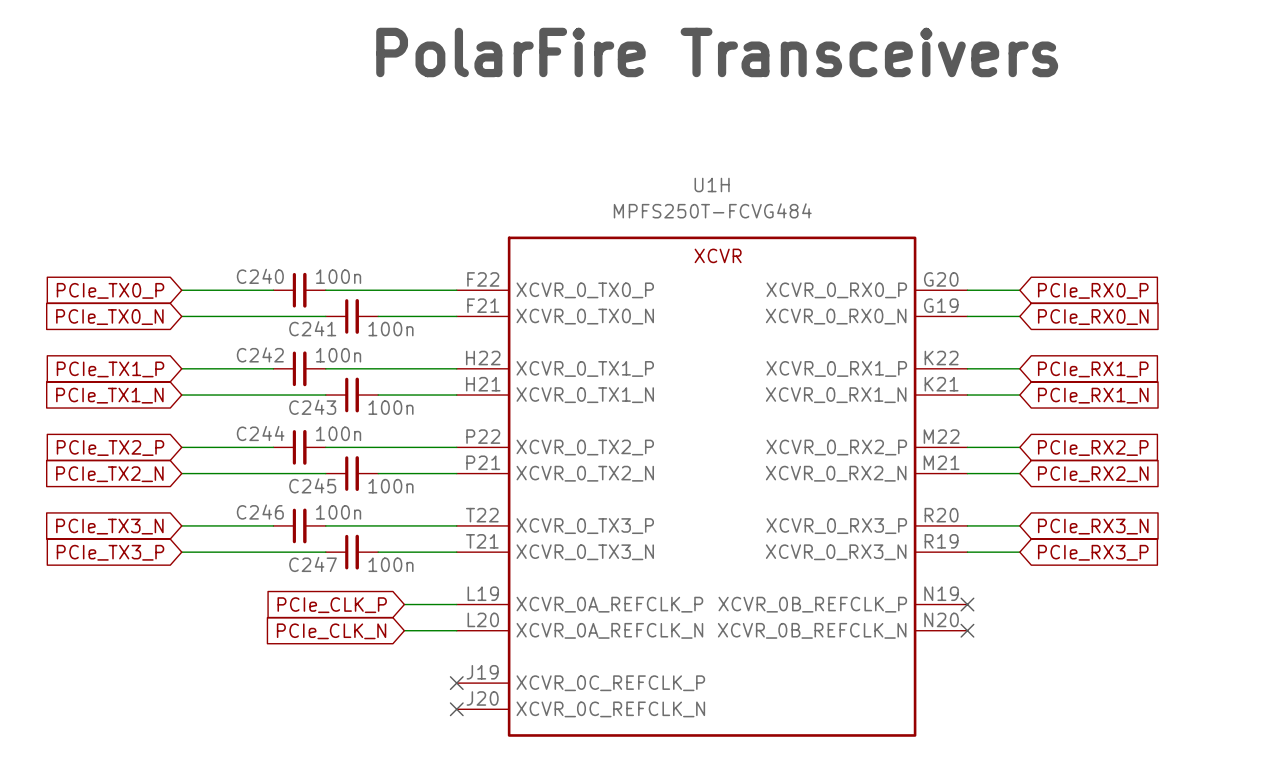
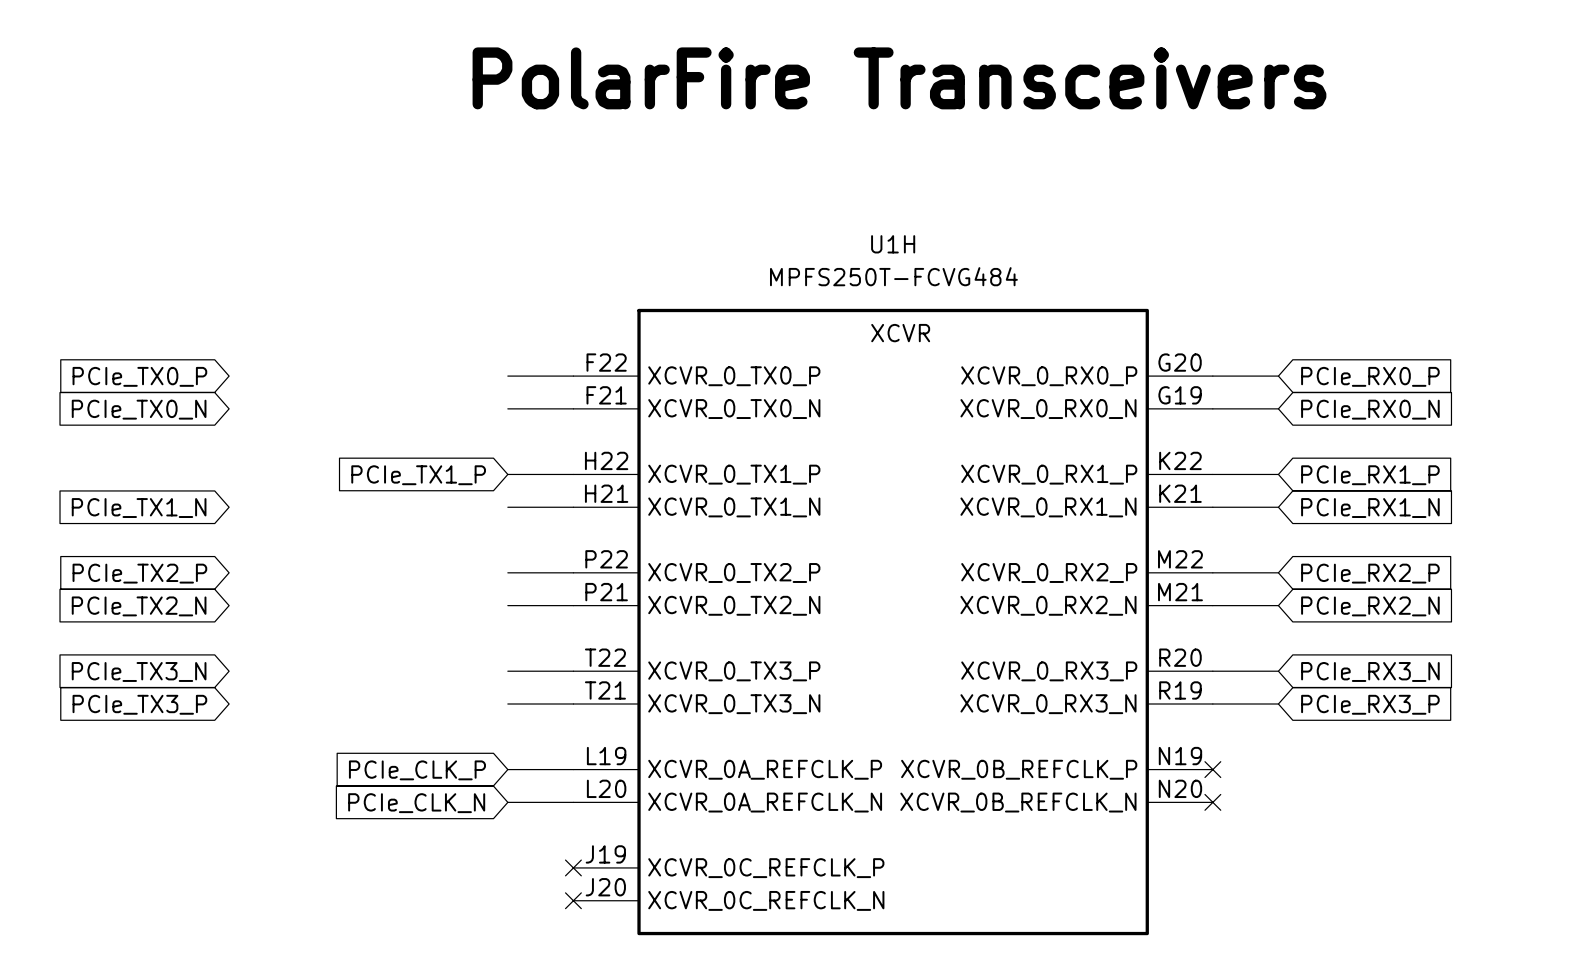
wire: (181, 290) (273, 290) -> none
C240: (299, 290) -> none
wire: (325, 290) (404, 290) -> none
wire: (181, 316) (325, 316) -> none
C241: (351, 316) -> none
wire: (378, 316) (404, 316) -> none
wire: (181, 368) (273, 368) -> none
C242: (299, 368) -> none
wire: (325, 368) (404, 368) -> none
global label position: PCIe_TX1_P (110, 369) -> PCIe_TX1_P (418, 475)
wire: (181, 395) (325, 395) -> none
C243: (351, 395) -> none
wire: (378, 395) (404, 395) -> none
wire: (181, 447) (273, 447) -> none
C244: (299, 447) -> none
wire: (325, 447) (404, 447) -> none
wire: (181, 473) (325, 473) -> none
C245: (351, 473) -> none
wire: (378, 473) (404, 473) -> none
wire: (181, 525) (273, 525) -> none
C246: (299, 525) -> none
wire: (325, 525) (404, 525) -> none
wire: (181, 552) (325, 552) -> none
C247: (351, 552) -> none
wire: (378, 552) (404, 552) -> none

